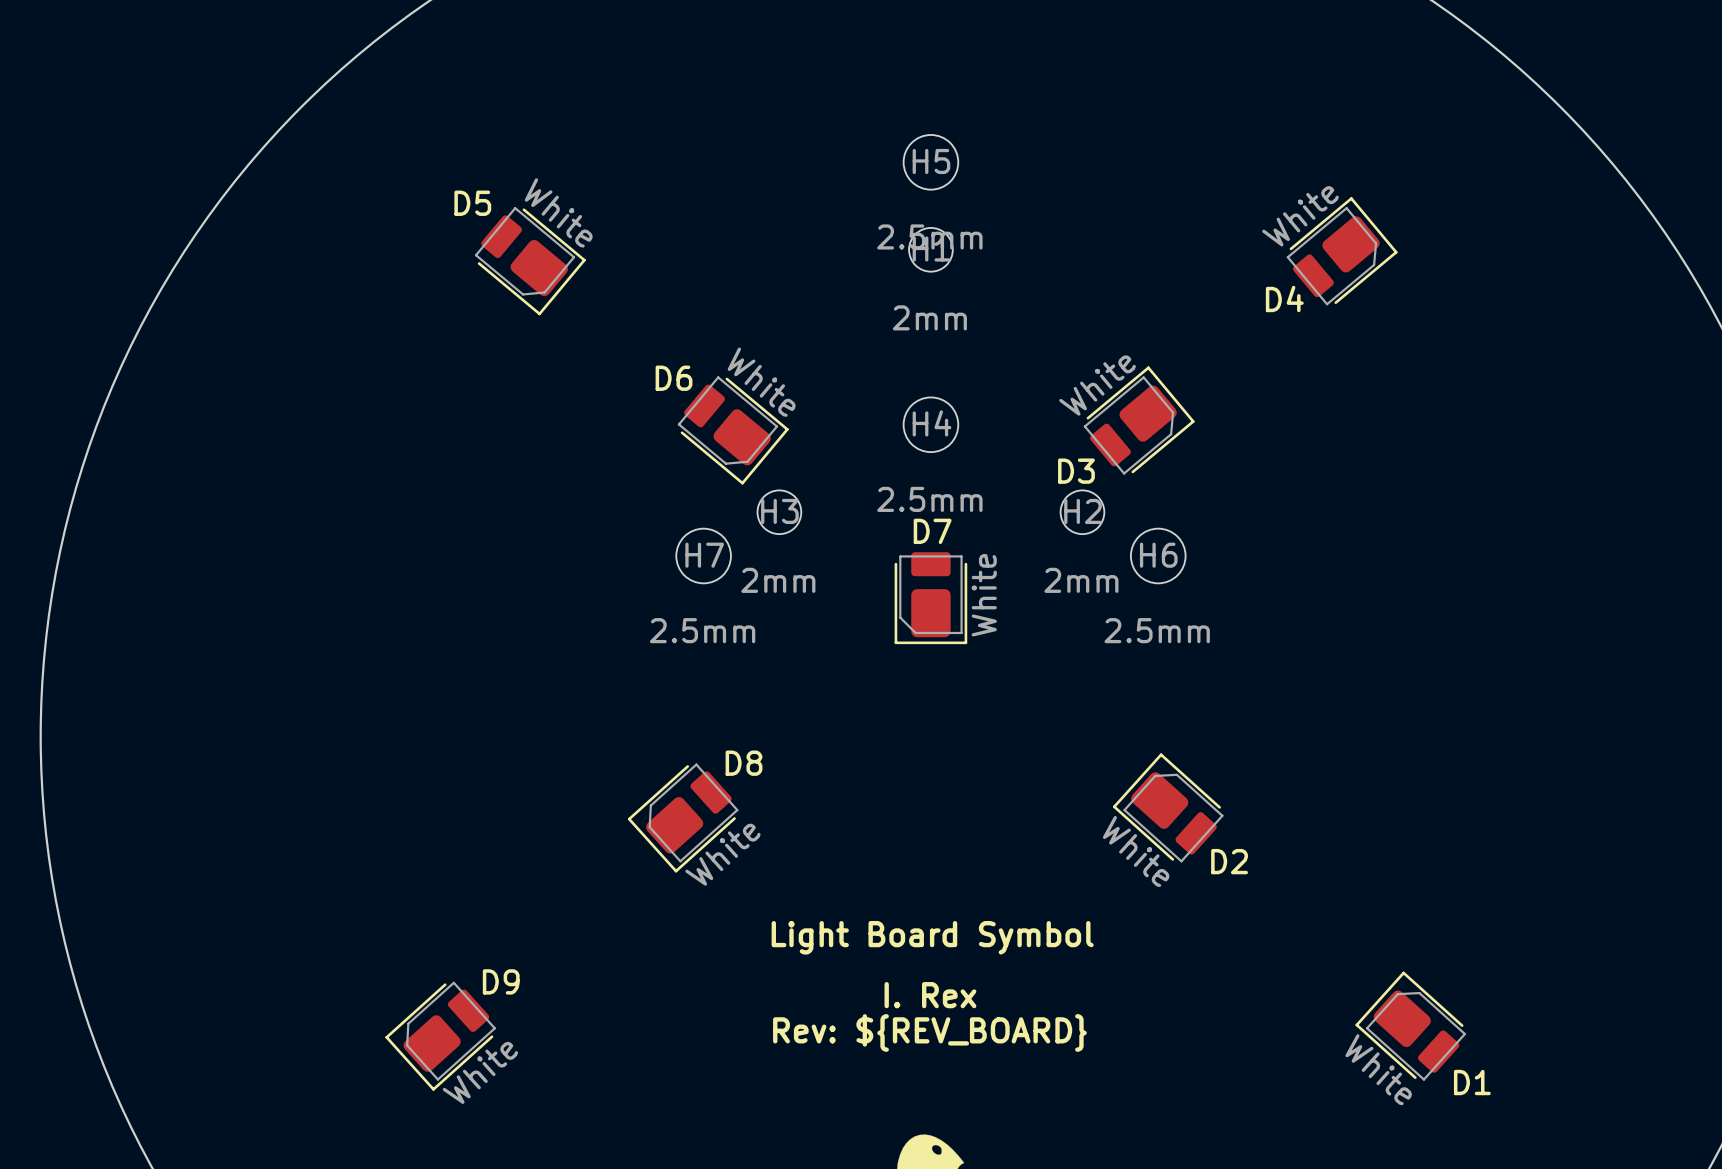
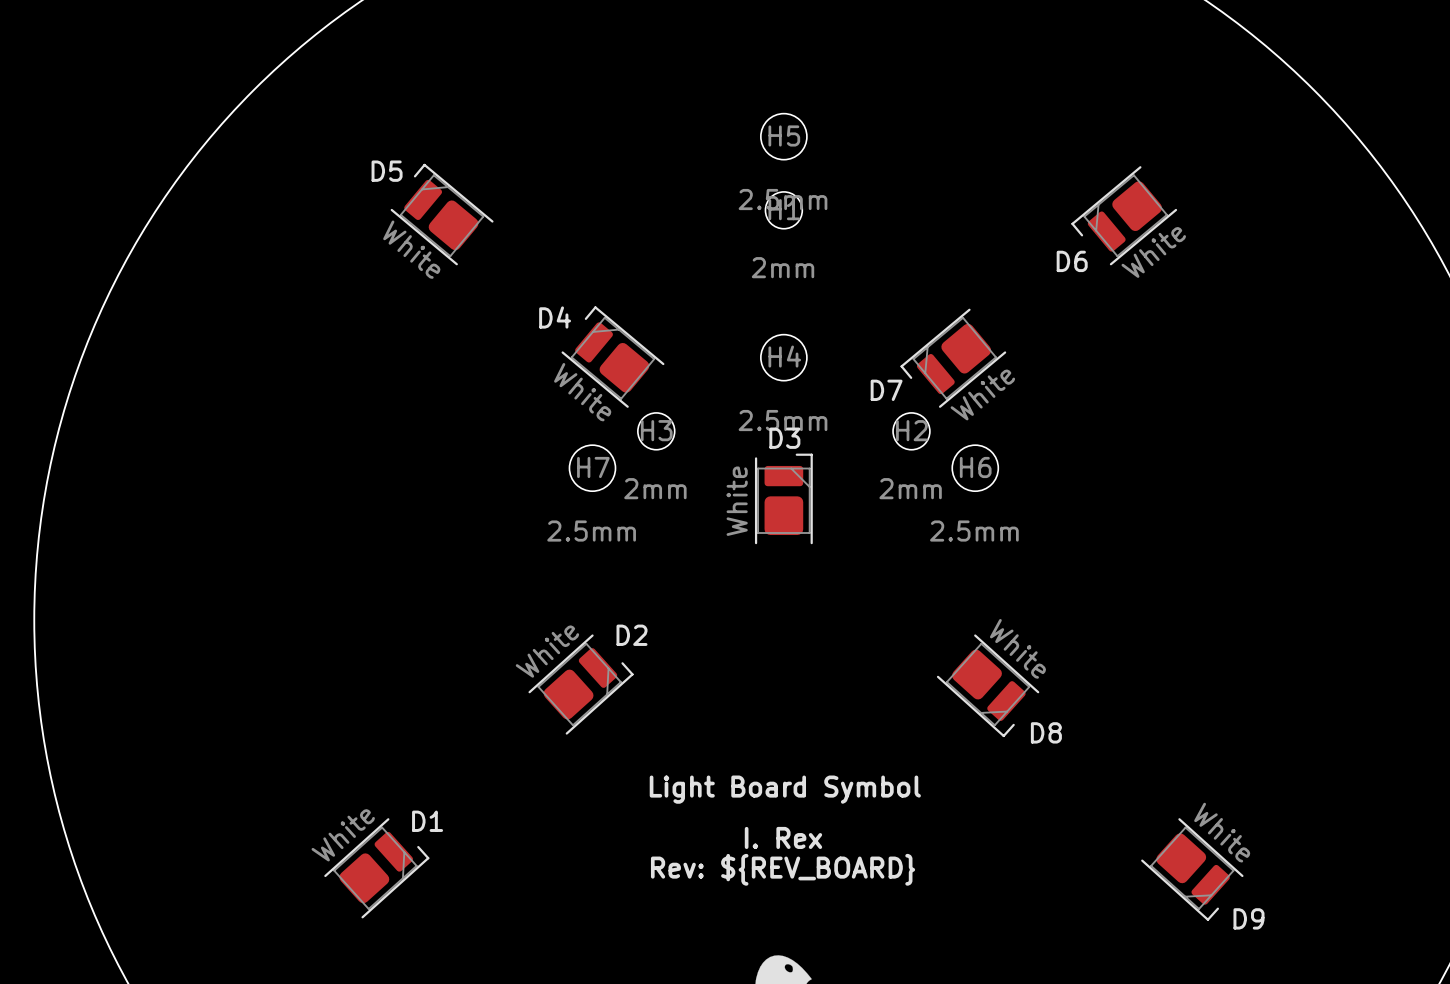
D4 footprint: [1286, 197, 1398, 306] -> [561, 306, 665, 408]
D5 footprint: [474, 207, 586, 316] -> [390, 163, 494, 266]
D5 value position: White (558, 212) -> White (411, 249)
D4 value position: White (1300, 216) -> White (582, 392)
D4 name position: D4 (1284, 298) -> D4 (555, 317)
D3 footprint: [1083, 366, 1195, 475] -> [754, 453, 813, 545]
D6 footprint: [677, 376, 789, 485] -> [1071, 166, 1178, 266]
D6 name position: D6 (674, 378) -> D6 (1072, 261)
D6 value position: White (761, 382) -> White (1153, 252)
D3 name position: D3 (1076, 471) -> D3 (784, 438)
D7 name position: D7 (932, 531) -> D7 (886, 390)
D7 footprint: [894, 552, 968, 645] -> [900, 308, 1007, 408]
D7 value position: White (984, 595) -> White (982, 394)
D2 footprint: [1112, 753, 1224, 863] -> [528, 634, 634, 735]
D8 footprint: [627, 763, 739, 873] -> [936, 634, 1040, 738]
D8 name position: D8 (744, 763) -> D8 (1046, 732)
D2 value position: White (1136, 851) -> White (547, 651)
D8 value position: White (722, 854) -> White (1017, 648)
D2 name position: D2 (1229, 861) -> D2 (632, 635)
D1 footprint: [1355, 971, 1467, 1081] -> [324, 818, 430, 919]
D9 footprint: [385, 981, 496, 1091] -> [1141, 818, 1244, 921]
D9 name position: D9 (501, 981) -> D9 (1248, 918)
D1 value position: White (1378, 1069) -> White (343, 835)
D9 value position: White (480, 1072) -> White (1222, 832)
D1 name position: D1 (1472, 1082) -> D1 (427, 821)

